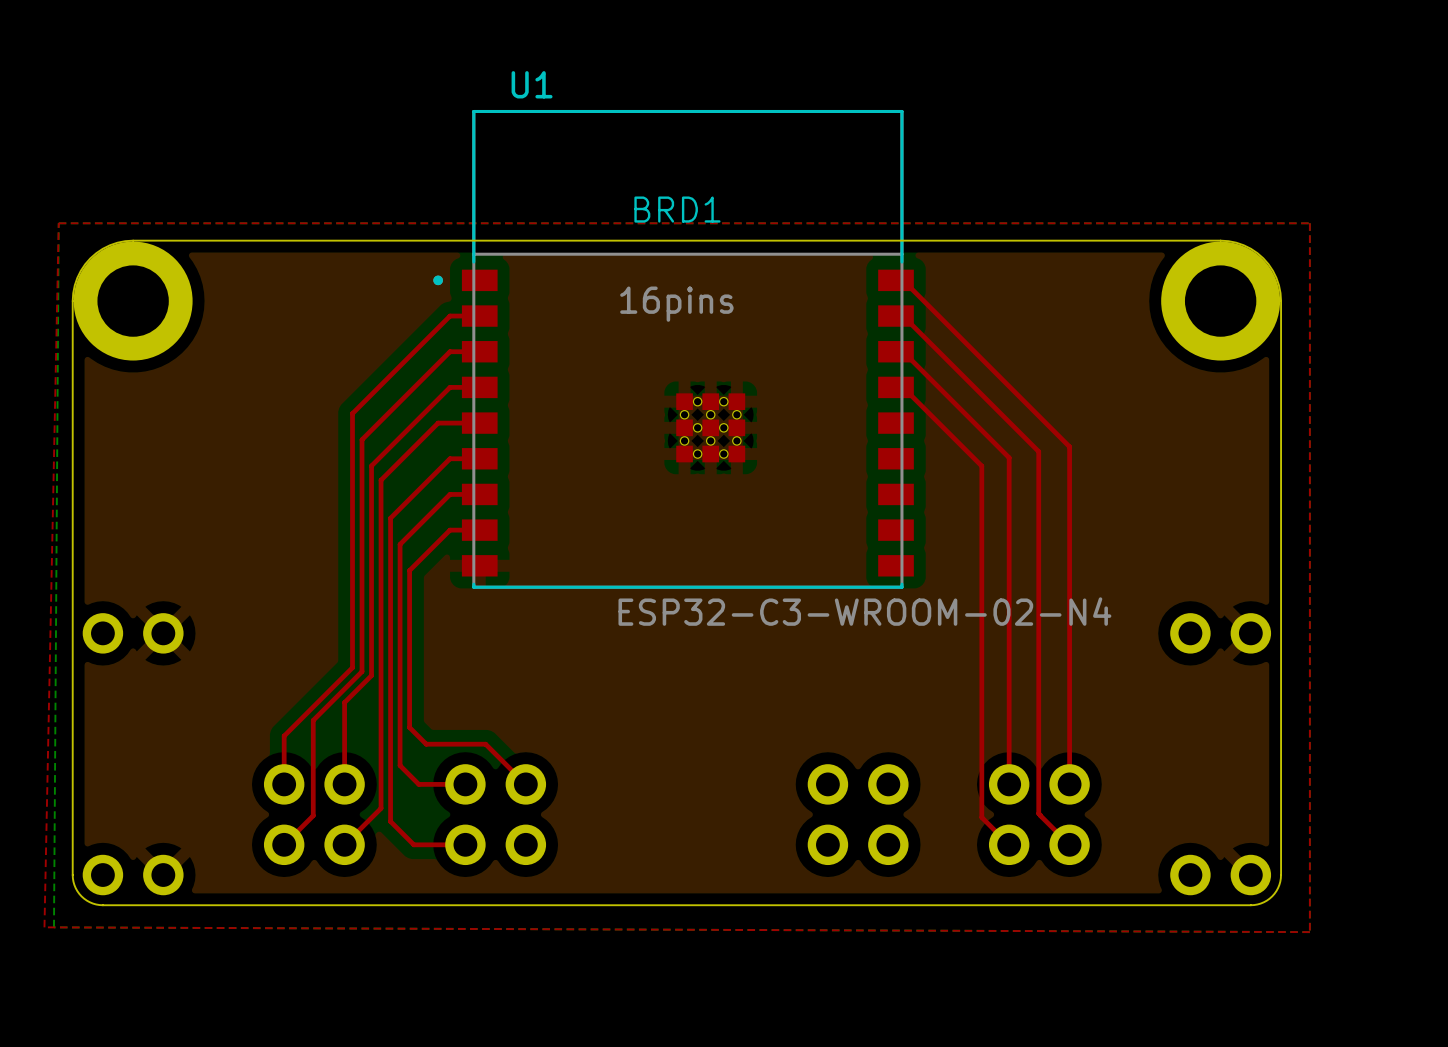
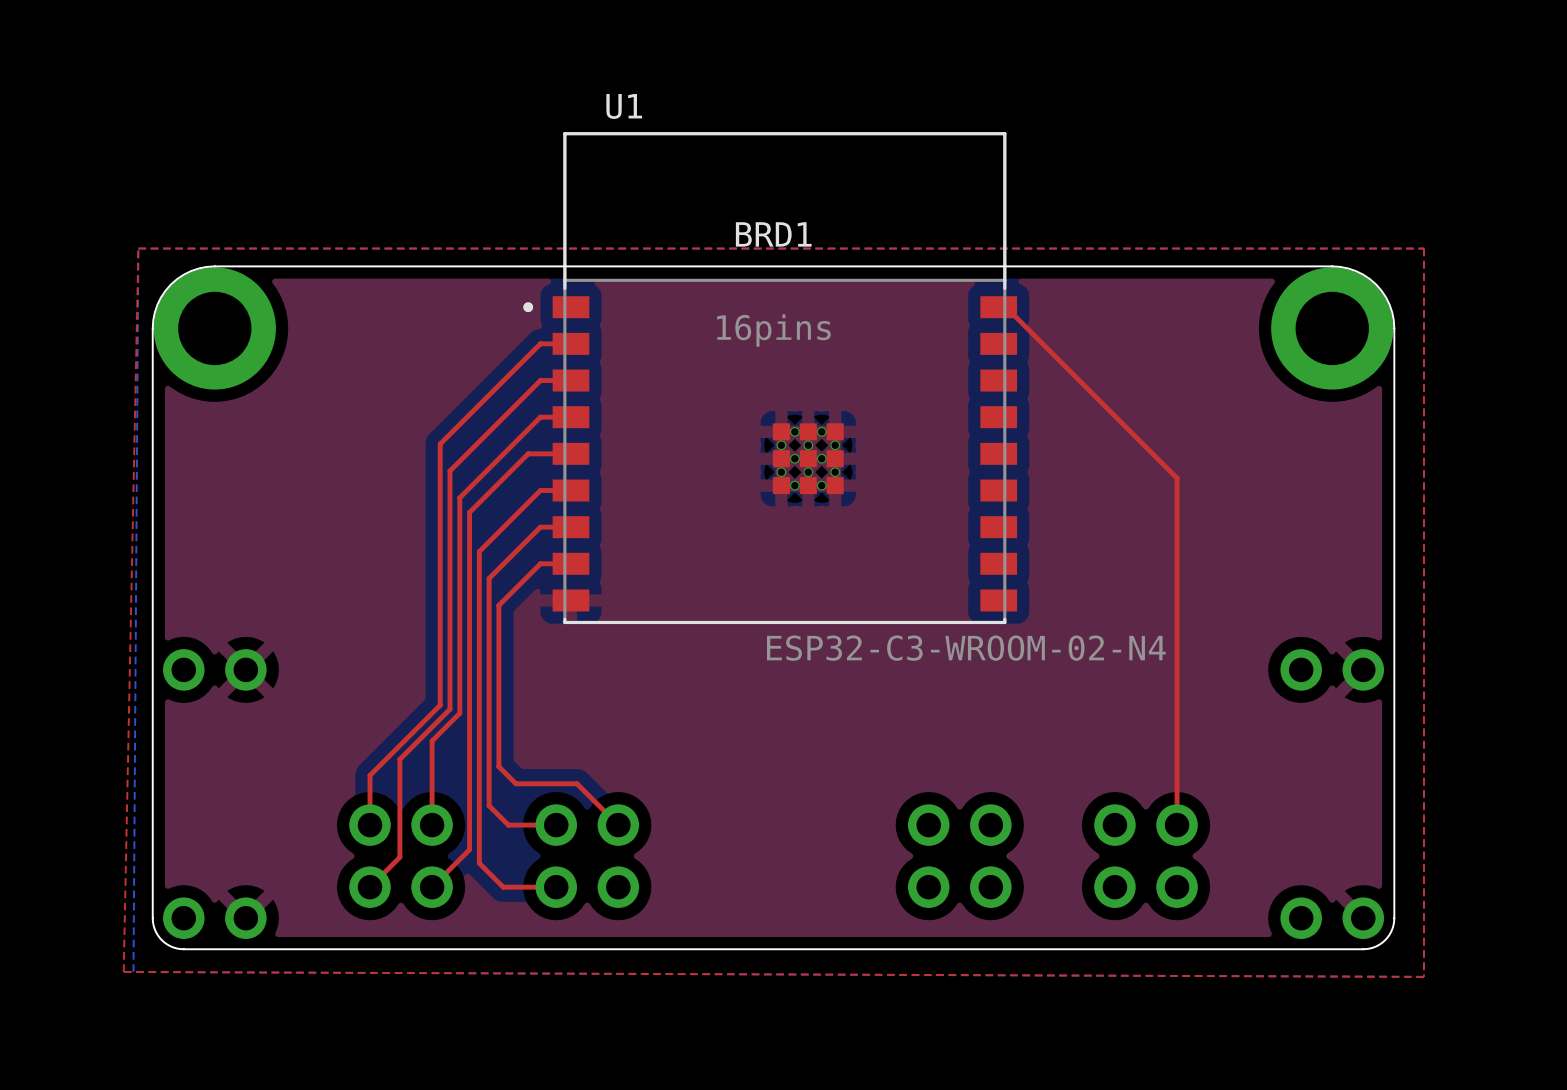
top track: (896, 316) (903, 316) (1038, 451) (1038, 813) (1040, 815) -> none
top track: (896, 351) (903, 351) (1009, 457) (1009, 784) -> none
top track: (896, 387) (903, 387) (981, 466) (981, 817) (1009, 844) -> none
top track: (1040, 815) (1069, 844) -> none

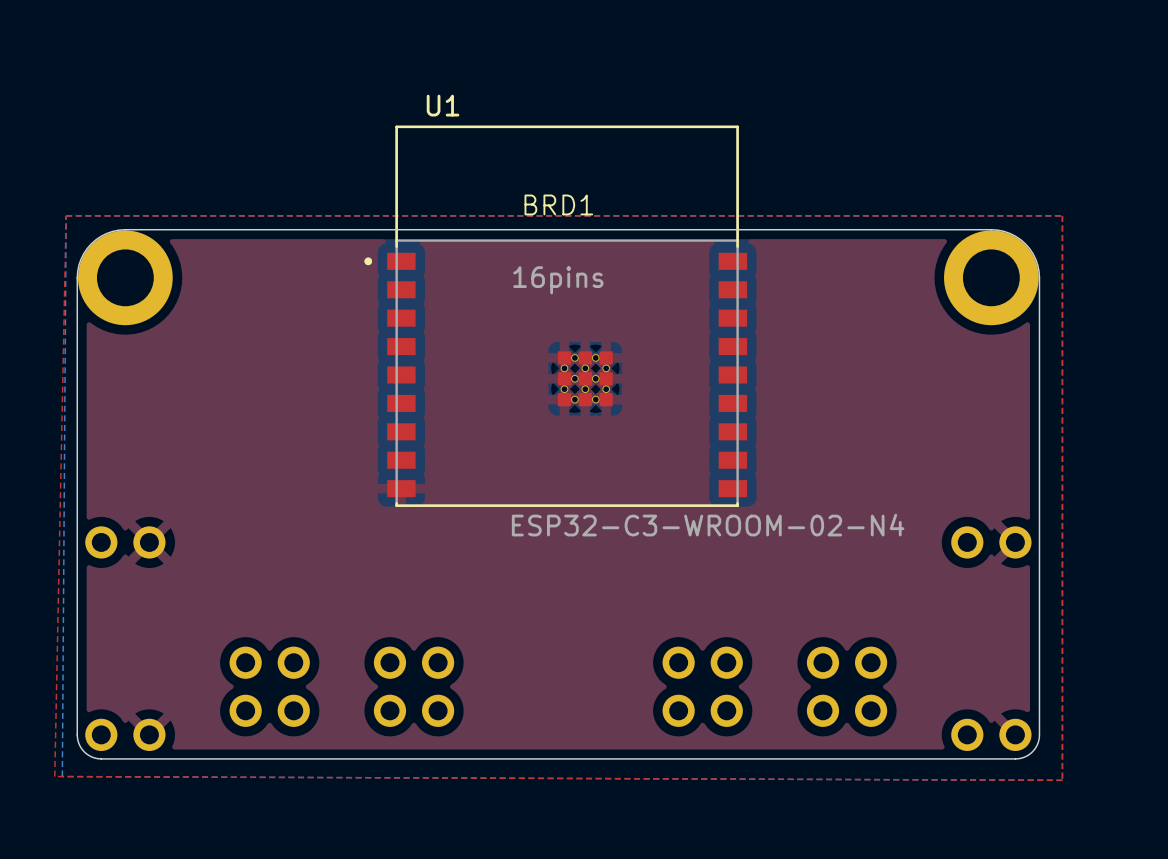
top track: (998, 307) (1006, 307) (1177, 478) (1177, 825) -> none
top track: (570, 343) (540, 343) (440, 444) (440, 705) (370, 775) (370, 825) -> none
top track: (570, 380) (540, 380) (450, 470) (450, 709) (399, 759) (399, 857) (370, 887) -> none
top track: (570, 417) (540, 417) (459, 497) (459, 713) (432, 740) (432, 825) -> none
top track: (570, 453) (528, 453) (469, 512) (469, 849) (432, 887) -> none
top track: (570, 490) (540, 490) (479, 551) (479, 863) (503, 887) (556, 887) -> none
top track: (570, 527) (540, 527) (489, 578) (489, 805) (508, 825) (556, 825) -> none
top track: (570, 563) (540, 563) (498, 605) (498, 766) (515, 783) (577, 783) (618, 825) -> none

